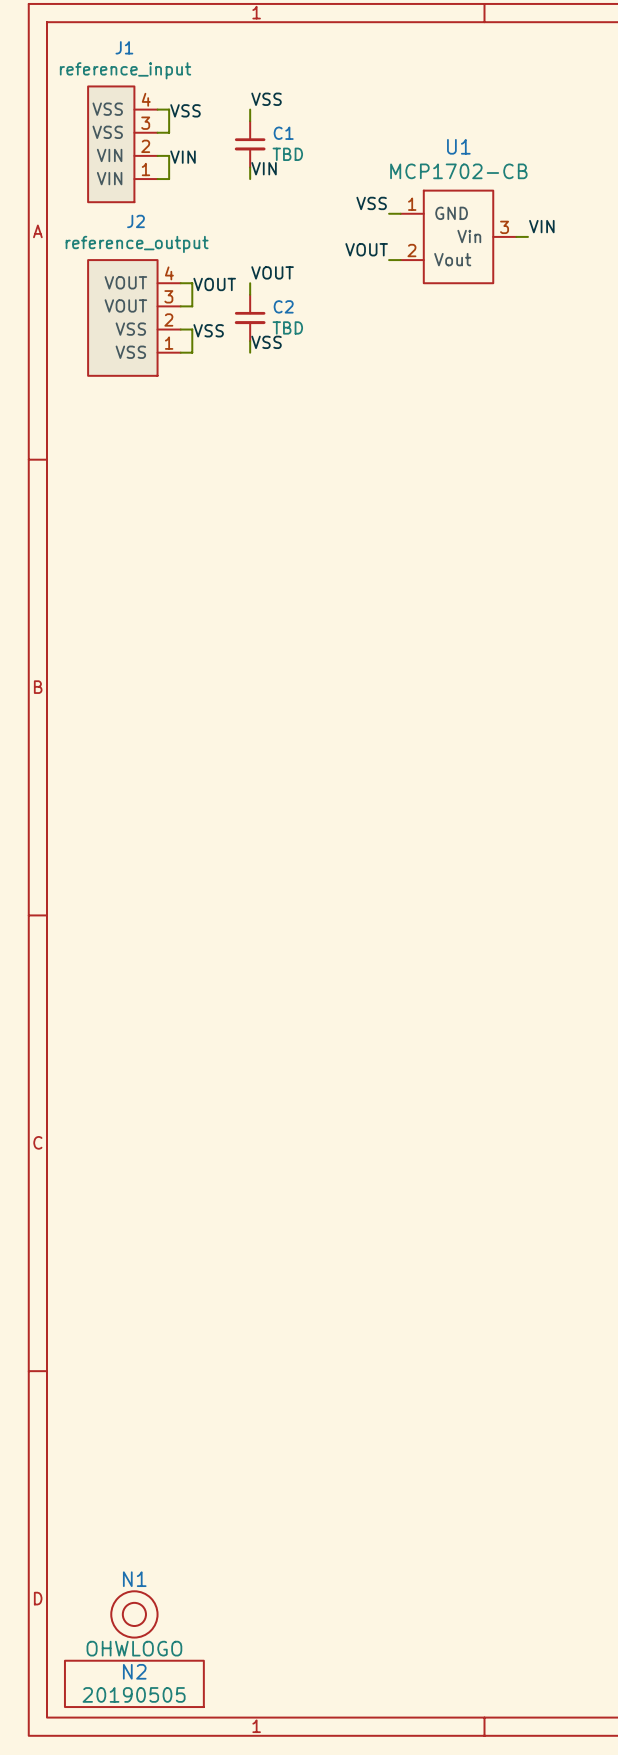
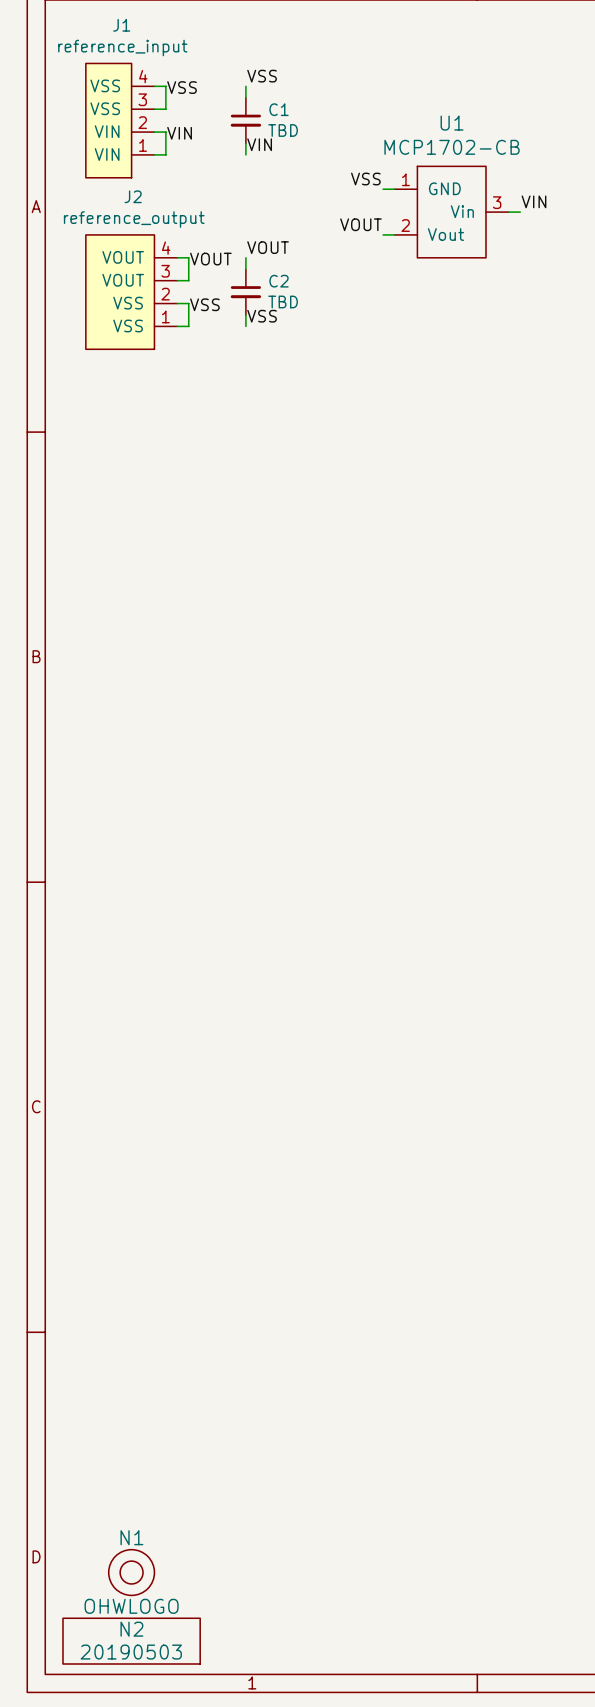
N2 value: 20190505 (134, 1694) -> 20190503 (131, 1652)

